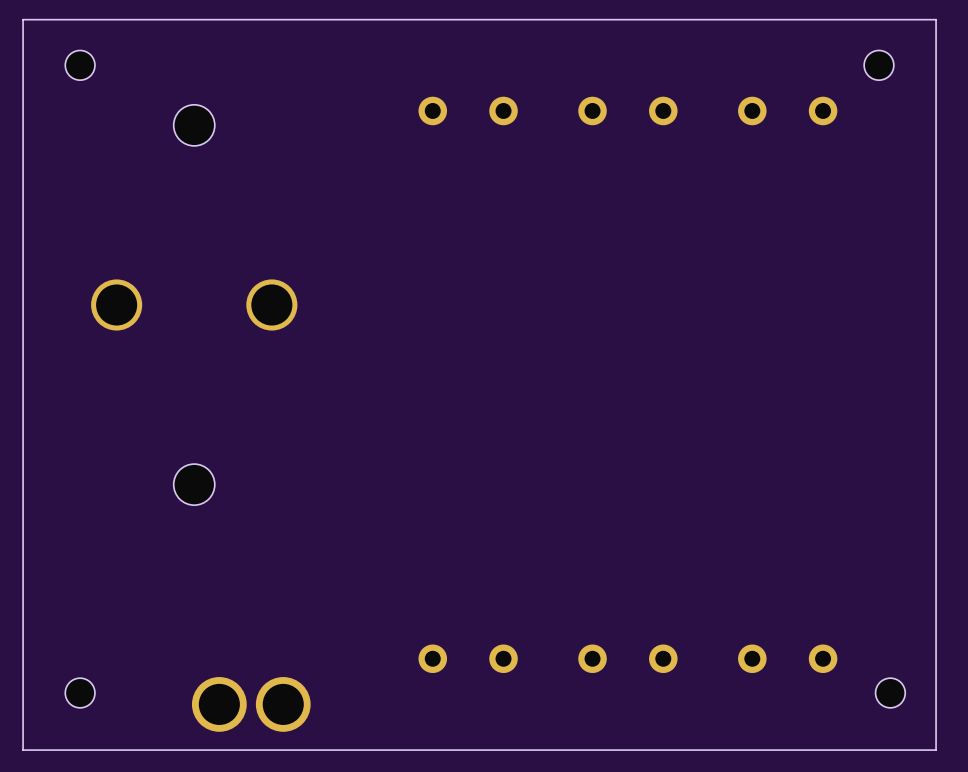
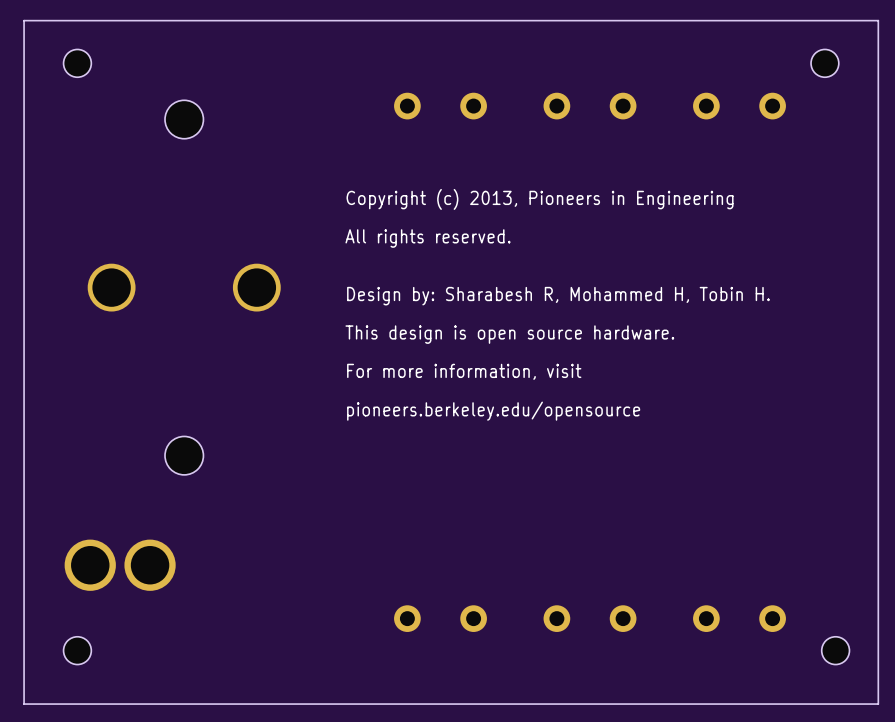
text: none -> Copyright (c) 2013, Pioneers in Engineering (540, 199)
text: none -> All rights reserved. (428, 238)
text: none -> Design by: Sharabesh R, Mohammed H, Tobin H. (558, 296)
text: none -> This design is open source hardware. (509, 334)
text: none -> For more information, visit (464, 371)
text: none -> pioneers.berkeley.edu/opensource (493, 411)
part position: (251, 704) -> (120, 565)

